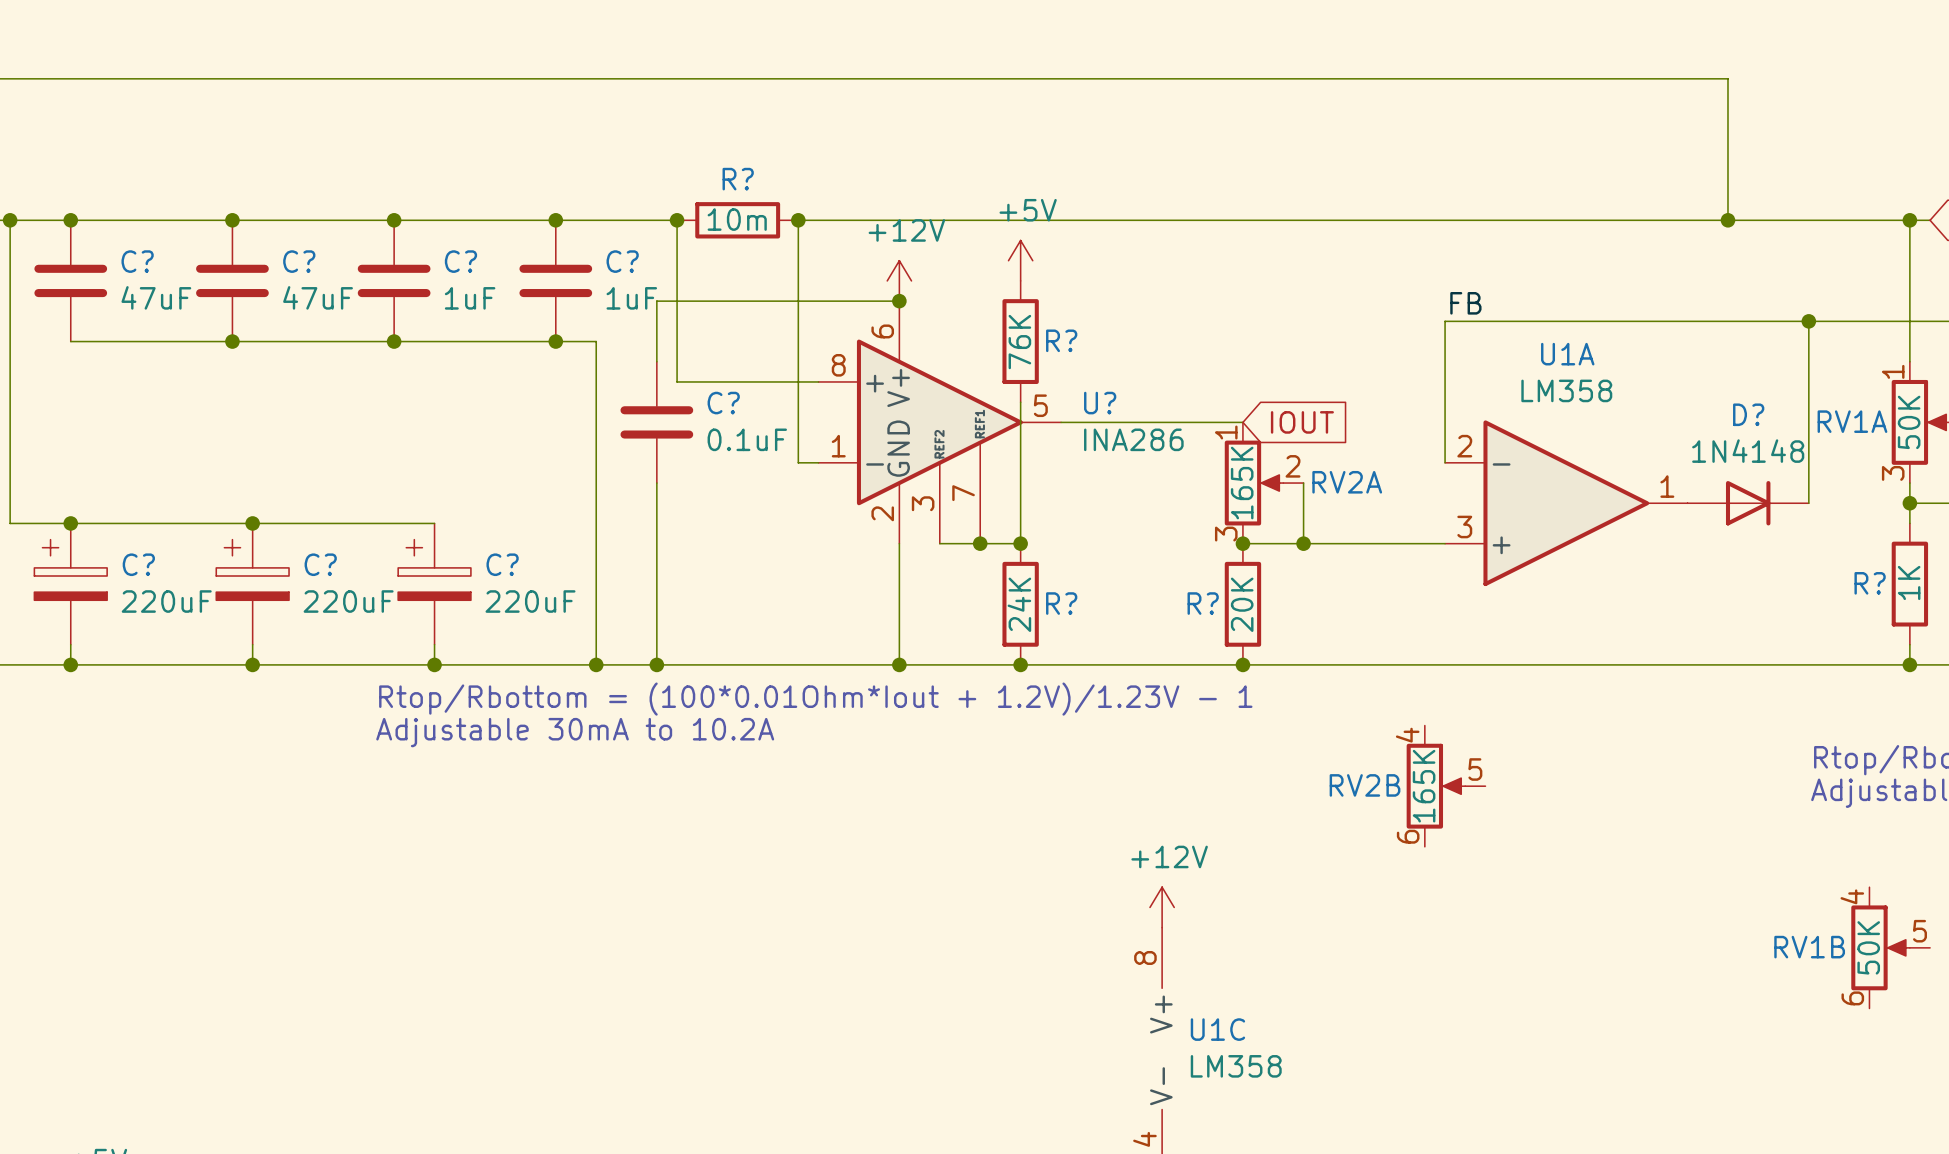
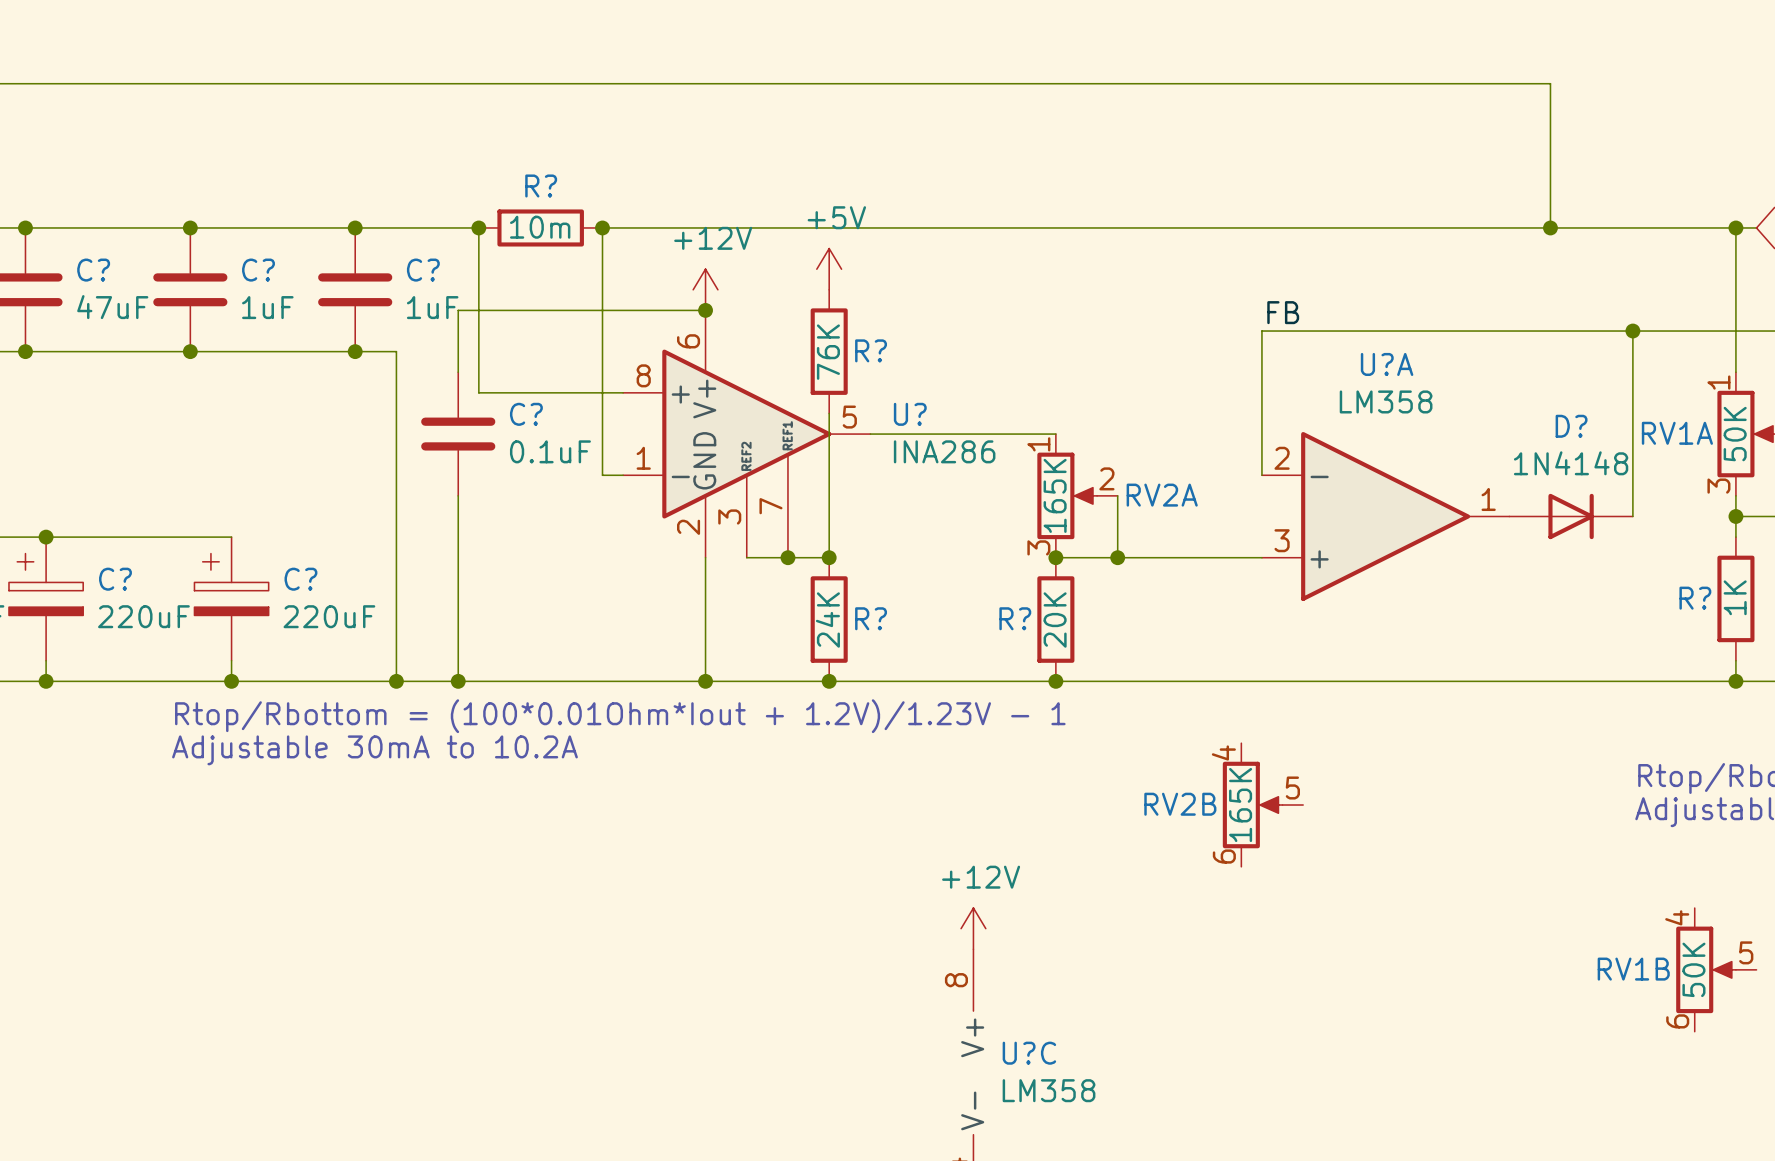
U1A name: U1A (1567, 354) -> U?A (1387, 364)
global label: IOUT (1302, 422) -> none
U1C name: U1C (1217, 1029) -> U?C (1029, 1053)

